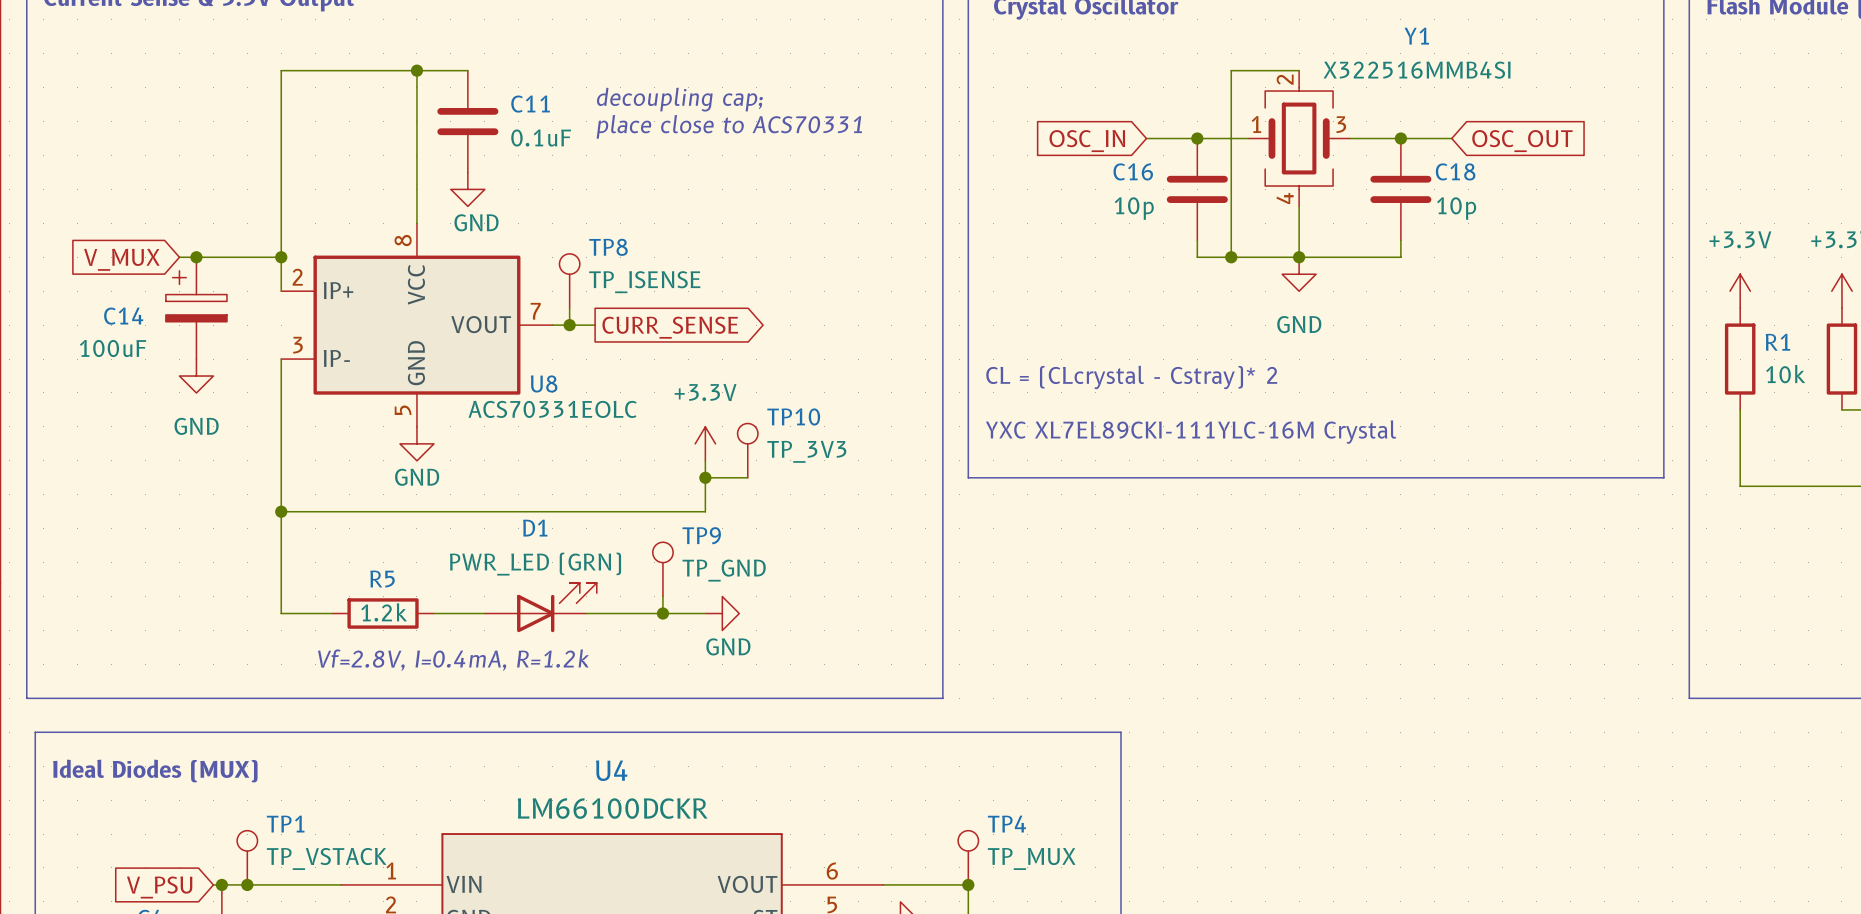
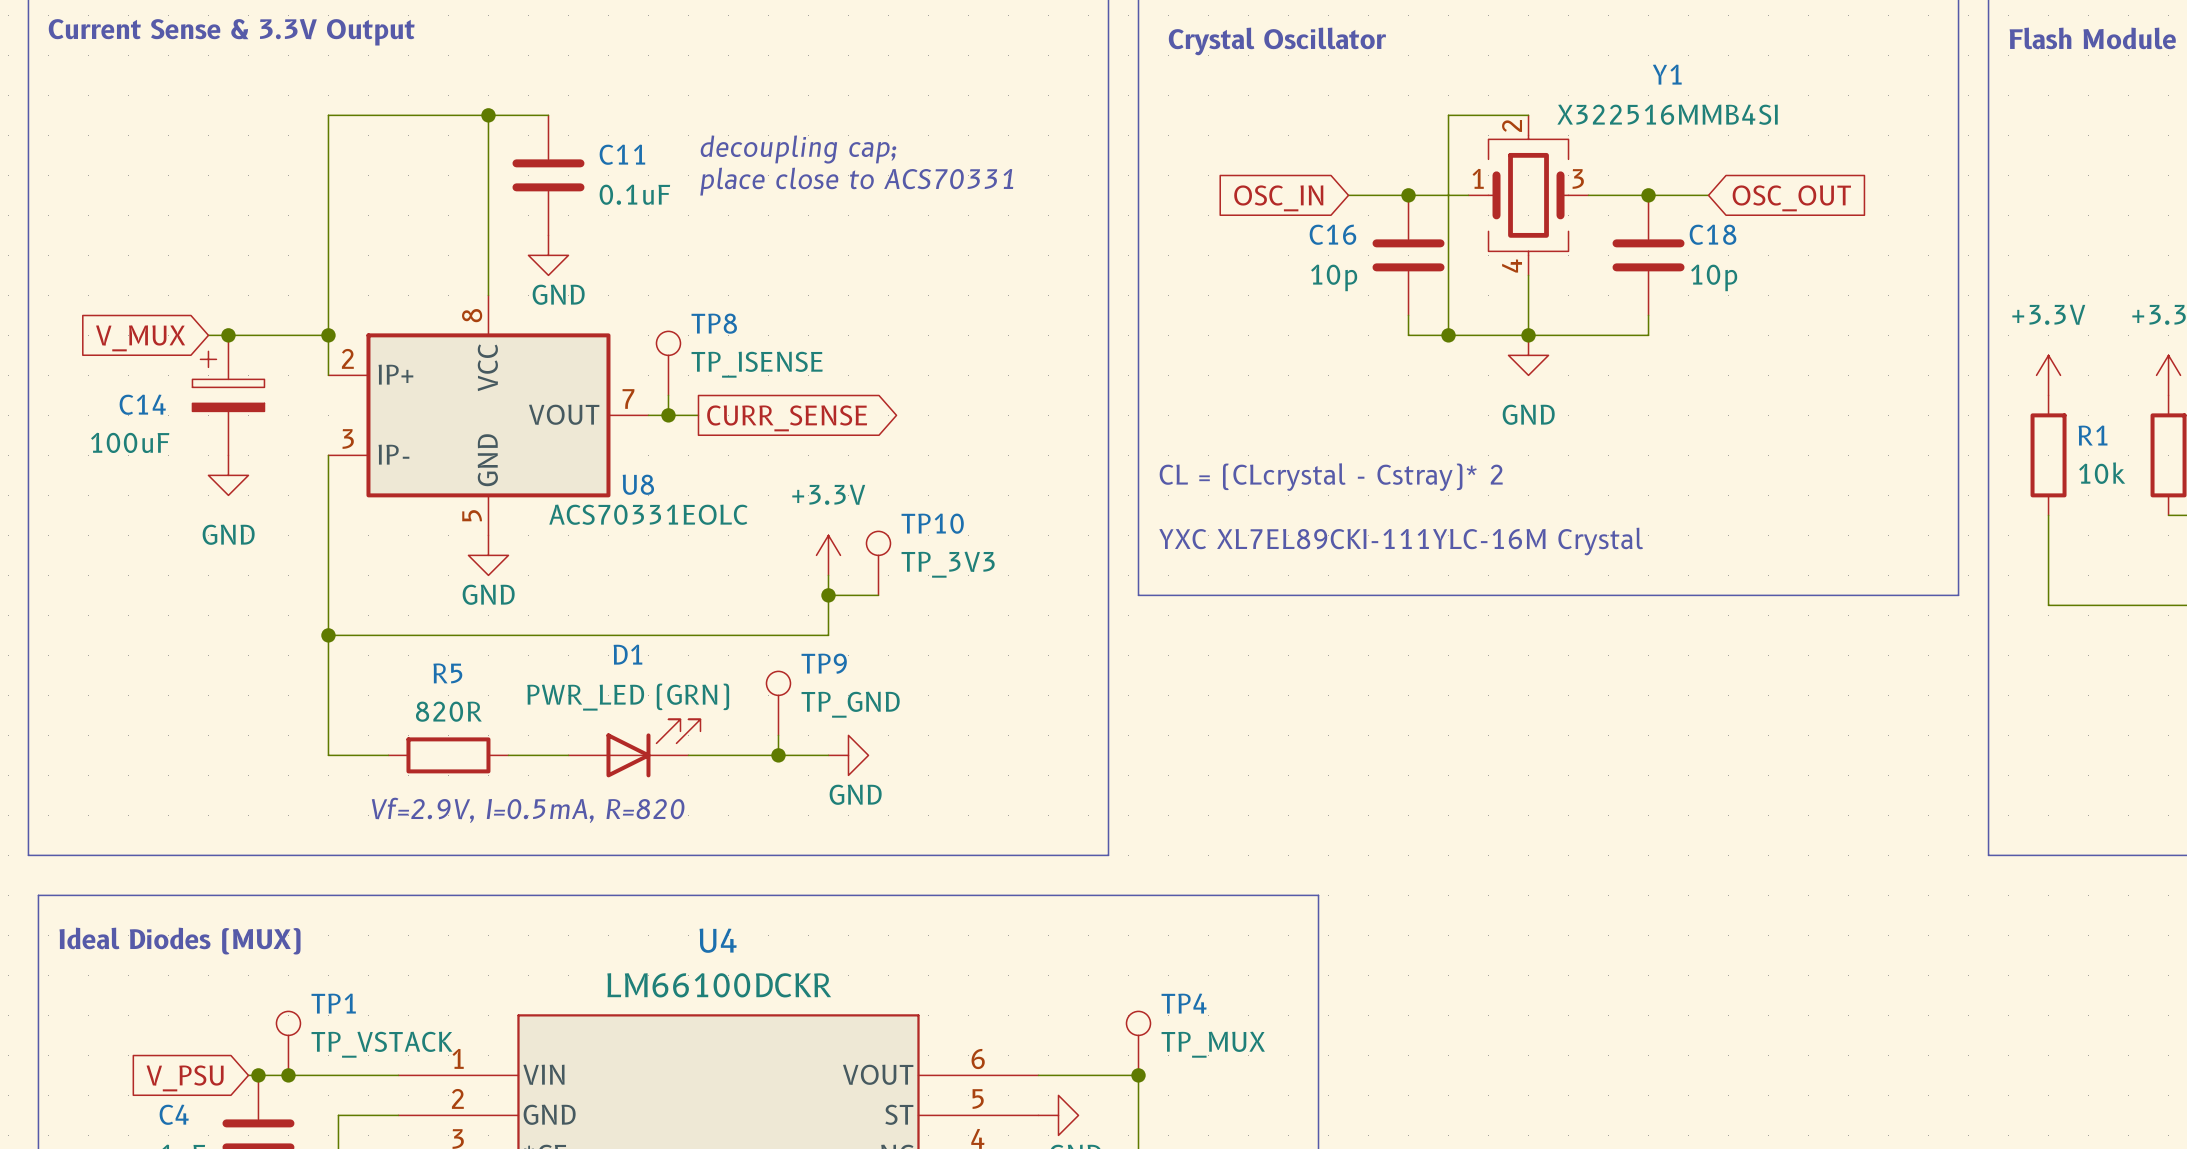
R5 name position: R5 (382, 579) -> R5 (447, 673)
R5 value: 1.2k (384, 612) -> 820R (448, 711)
text: Vf=2.8V, I=0.4mA, R=1.2k (453, 660) -> Vf=2.9V, I=0.5mA, R=820 (528, 810)

